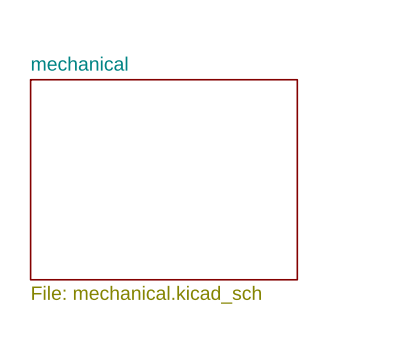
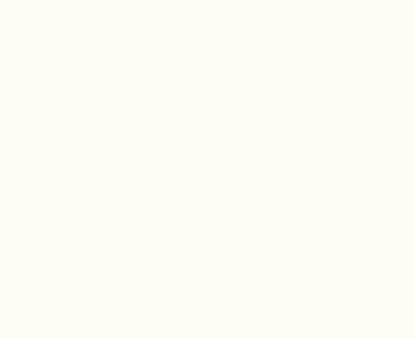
sheet mechanical: File: mechanical.kicad_sch (163, 179) -> none

